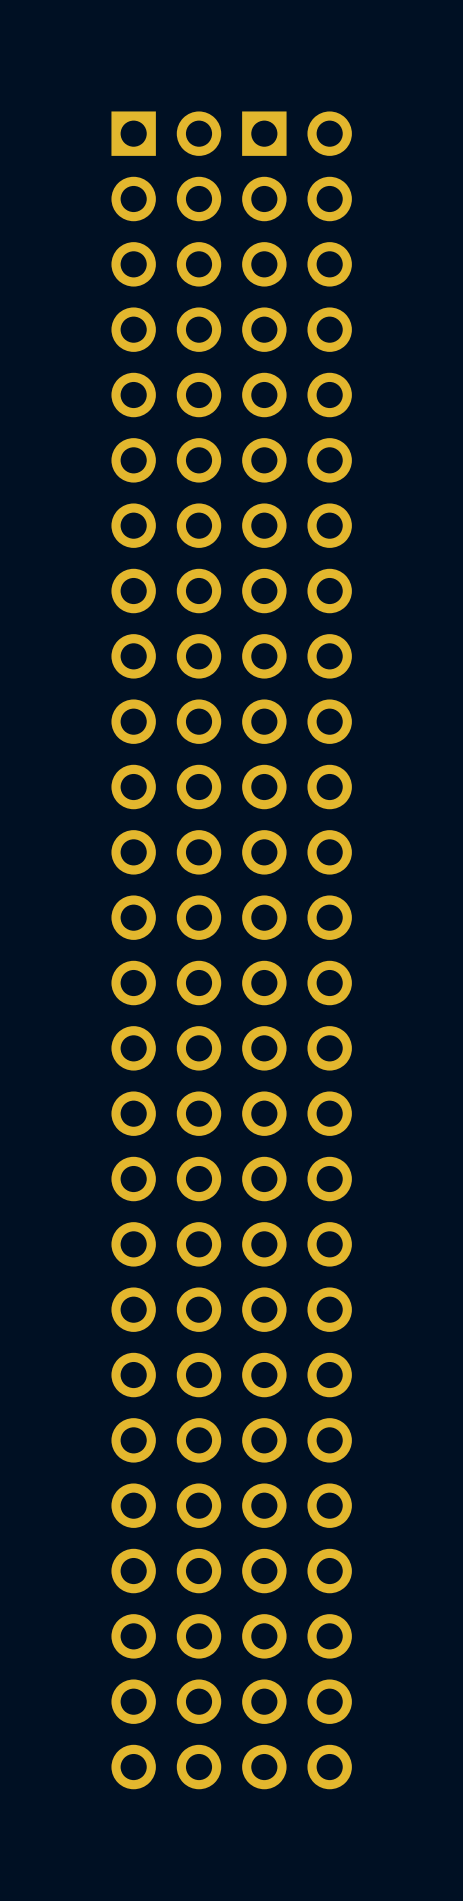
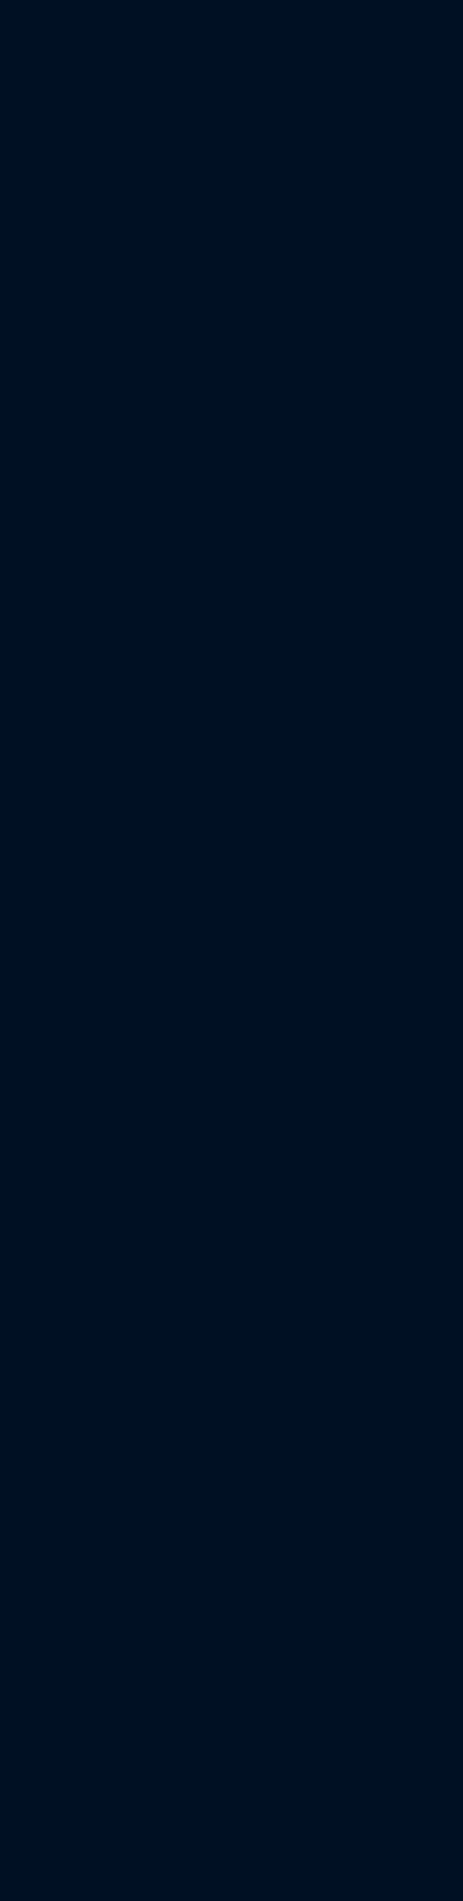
part: (166, 950) -> none
part: (297, 950) -> none

